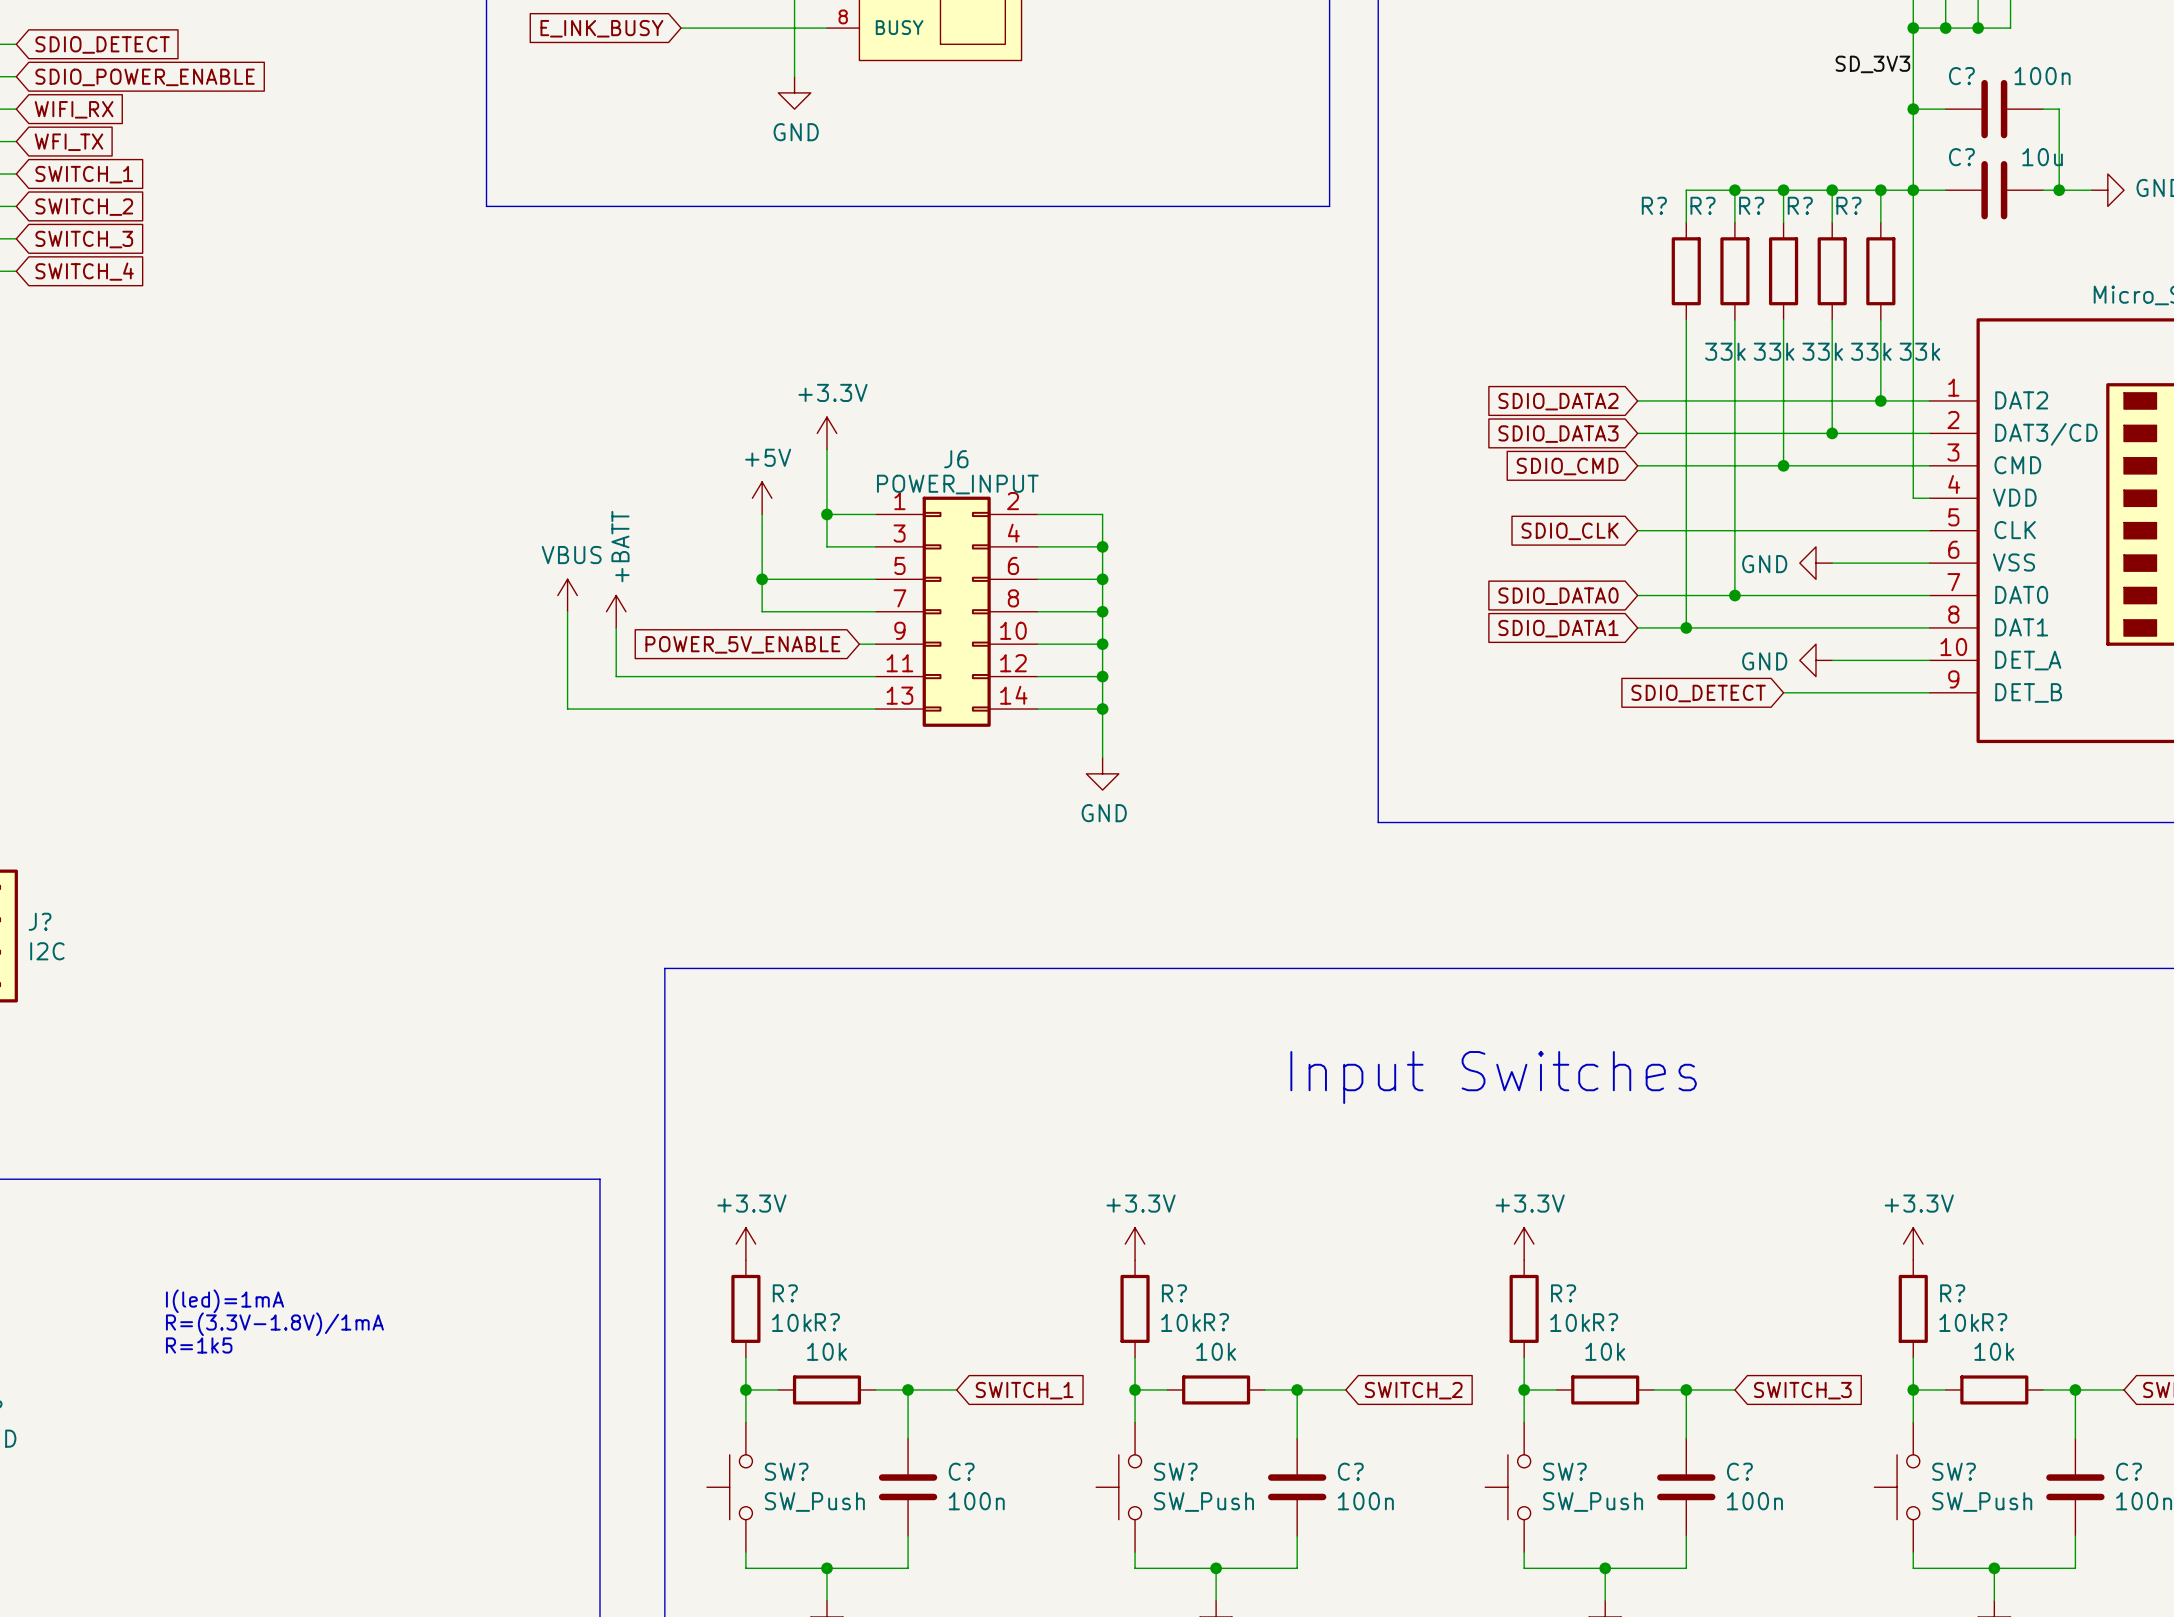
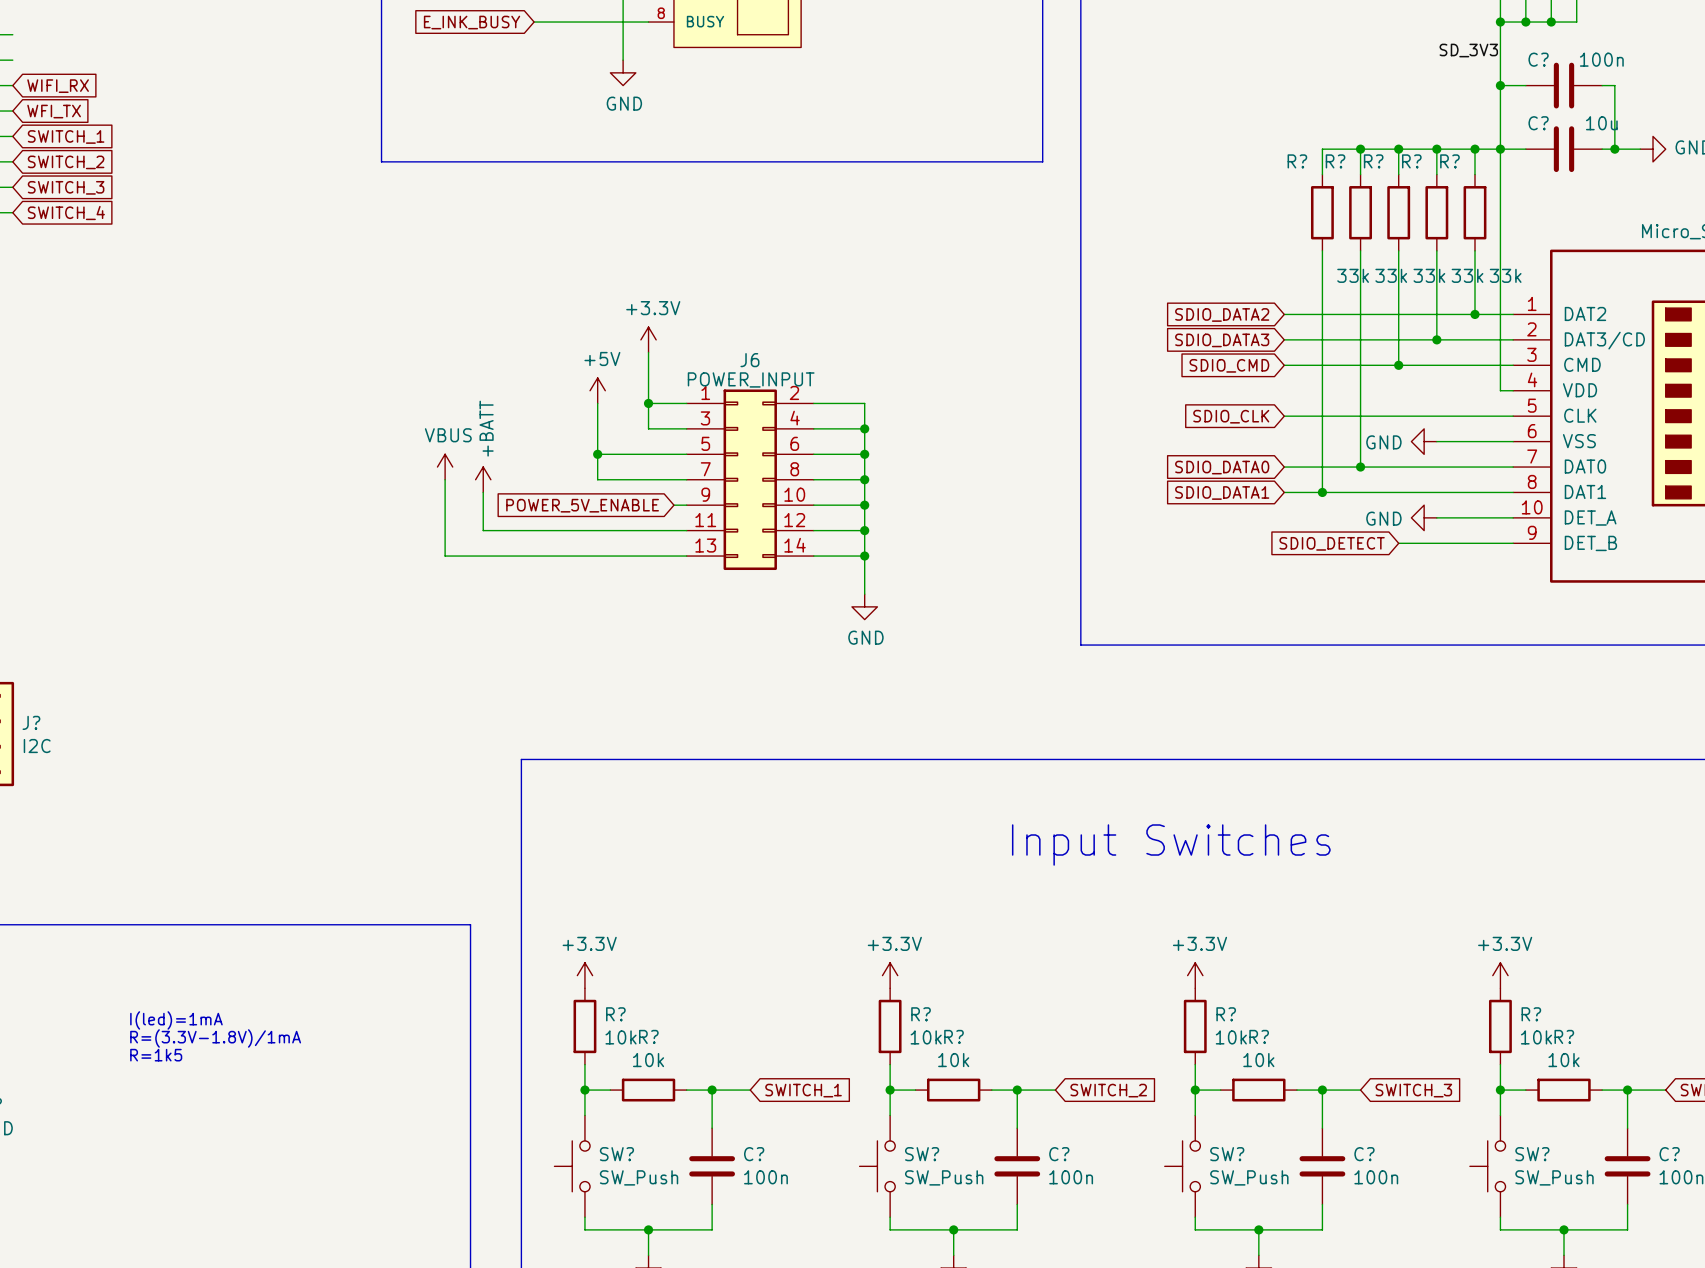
global label: SDIO_DETECT (102, 44) -> none
global label: SDIO_POWER_ENABLE (145, 77) -> none

